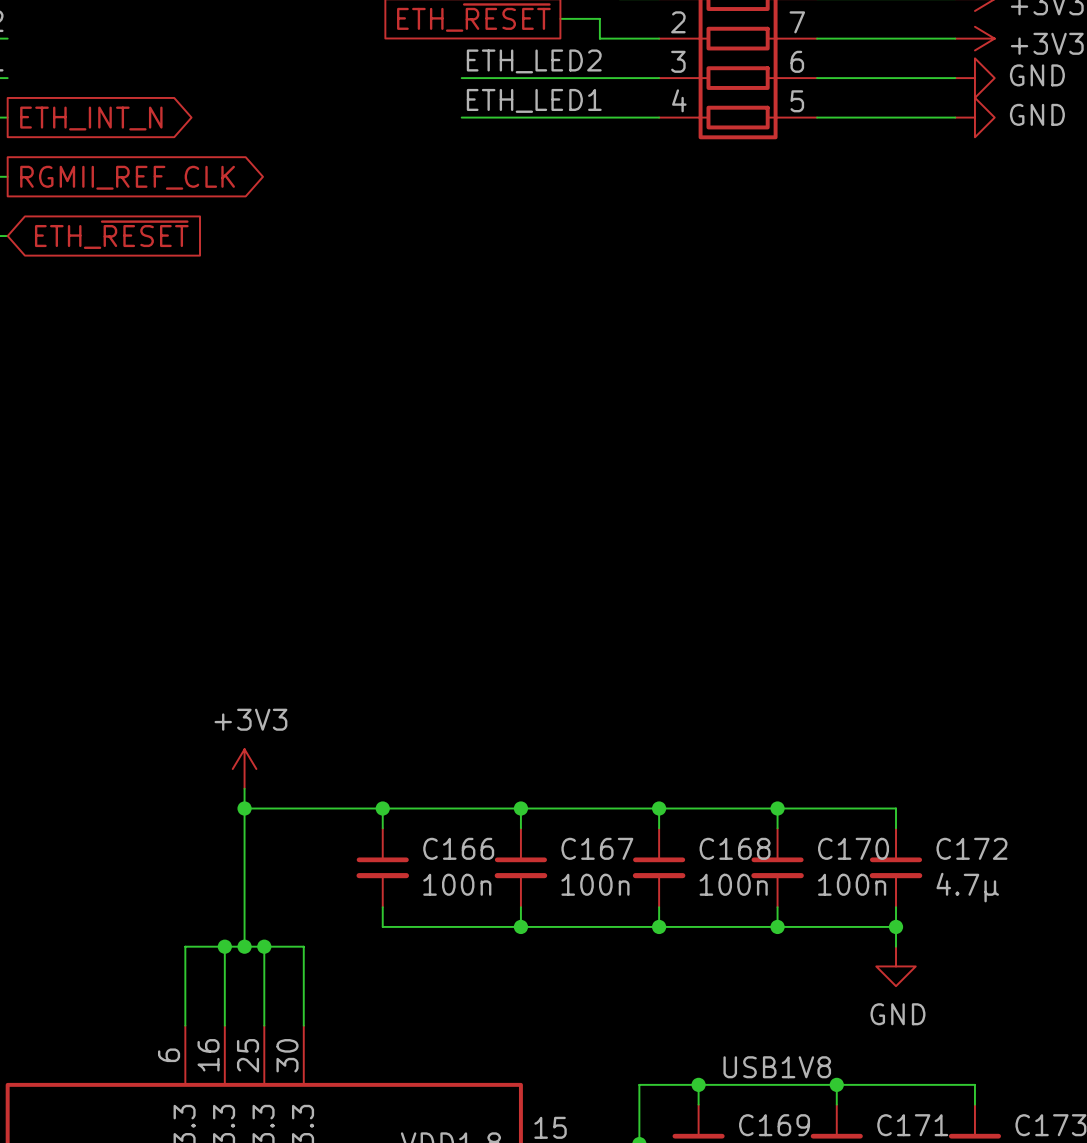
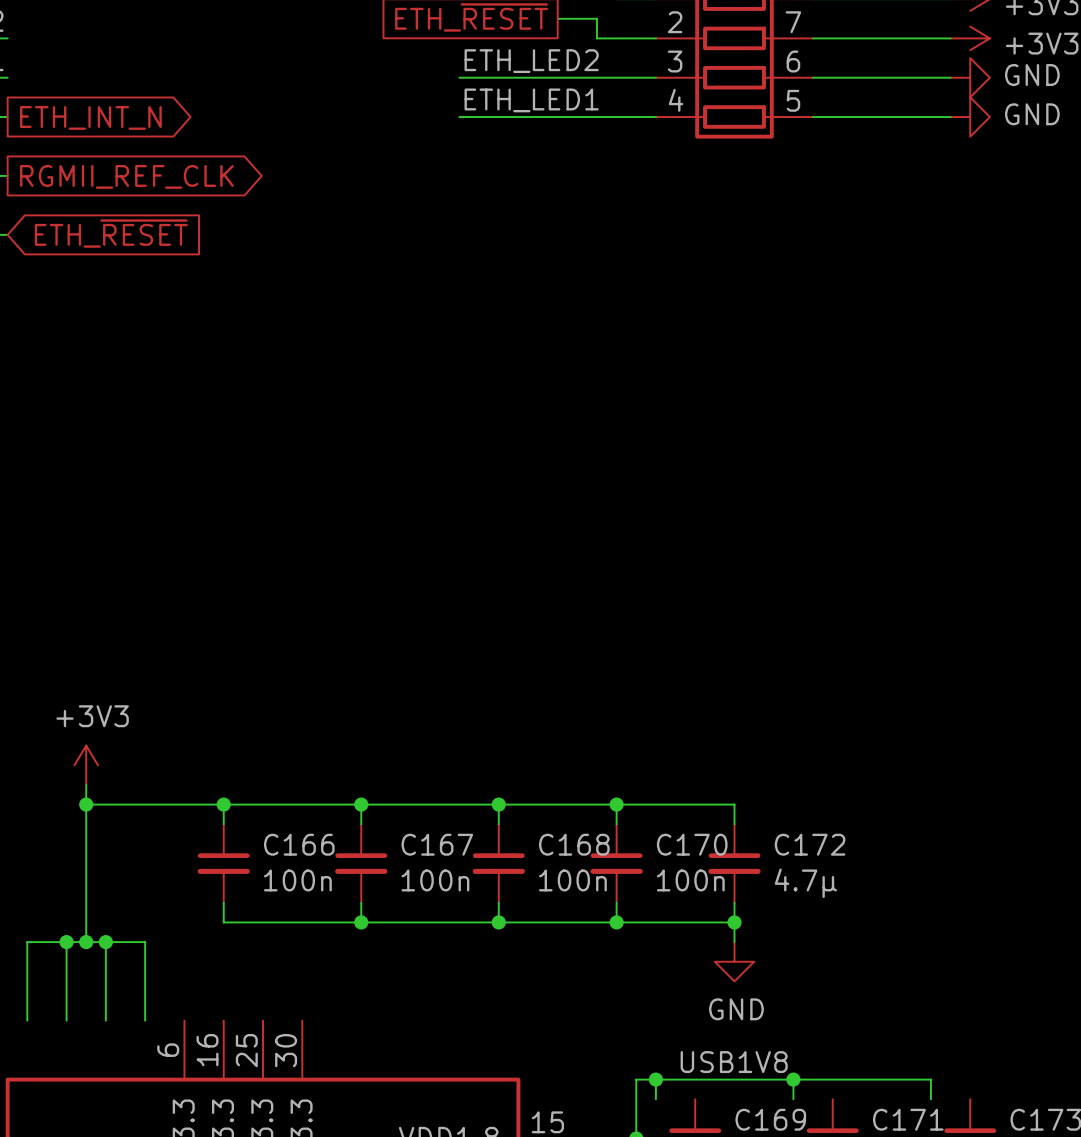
power symbol position: +3V3 (244, 769) -> +3V3 (86, 765)
wire: (244, 788) (244, 946) -> (86, 784) (86, 942)
wire: none -> (86, 804) (243, 804)
junction: none -> (86, 804)
junction position: (244, 808) -> (223, 804)
wire: (382, 808) (382, 828) -> (223, 804) (223, 824)
junction position: (382, 808) -> (361, 804)
wire: (520, 808) (520, 828) -> (361, 804) (361, 824)
junction position: (520, 808) -> (498, 804)
wire: (659, 808) (659, 828) -> (498, 804) (498, 824)
junction position: (659, 808) -> (616, 804)
wire: (738, 808) (896, 808) (896, 828) -> (734, 804) (734, 824)
wire: (777, 808) (777, 828) -> (616, 804) (616, 824)
junction: (777, 808) -> none
C166 position: (382, 867) -> (223, 863)
C167 position: (520, 867) -> (361, 863)
C168 position: (659, 867) -> (498, 863)
C170 position: (777, 867) -> (616, 863)
C172 position: (896, 867) -> (734, 863)
wire: (382, 907) (382, 926) -> (223, 902) (223, 922) (380, 922)
wire: (520, 907) (520, 926) -> (361, 902) (361, 922)
wire: (659, 907) (659, 926) -> (498, 902) (498, 922)
wire: (777, 907) (777, 926) -> (616, 902) (616, 922)
wire: (896, 907) (896, 946) -> (734, 902) (734, 942)
junction: none -> (361, 922)
junction position: (520, 926) -> (498, 922)
junction: none -> (616, 922)
junction: (659, 926) -> none
wire: (738, 926) (896, 926) -> none
junction: none -> (734, 922)
junction: (777, 926) -> none
junction: (896, 926) -> none
junction: none -> (66, 942)
junction: none -> (86, 942)
junction: none -> (105, 942)
wire: (224, 946) (224, 1025) -> (66, 942) (66, 1020)
junction: (224, 946) -> none
junction: (244, 946) -> none
wire: (264, 946) (264, 1025) -> (105, 942) (105, 1020)
junction: (264, 946) -> none
power symbol position: GND (896, 966) -> GND (734, 961)
wire: (185, 1025) (185, 946) (303, 946) (303, 1025) -> (27, 1020) (27, 942) (145, 942) (145, 1020)
label position: USB1V8 (777, 1067) -> USB1V8 (734, 1062)
wire: (698, 1084) (698, 1104) -> (655, 1079) (655, 1099)
junction position: (698, 1084) -> (655, 1079)
wire: (836, 1084) (836, 1104) -> (793, 1079) (793, 1099)
junction position: (836, 1084) -> (793, 1079)
wire: (935, 1084) (974, 1084) (974, 1104) -> (930, 1079) (930, 1099)

